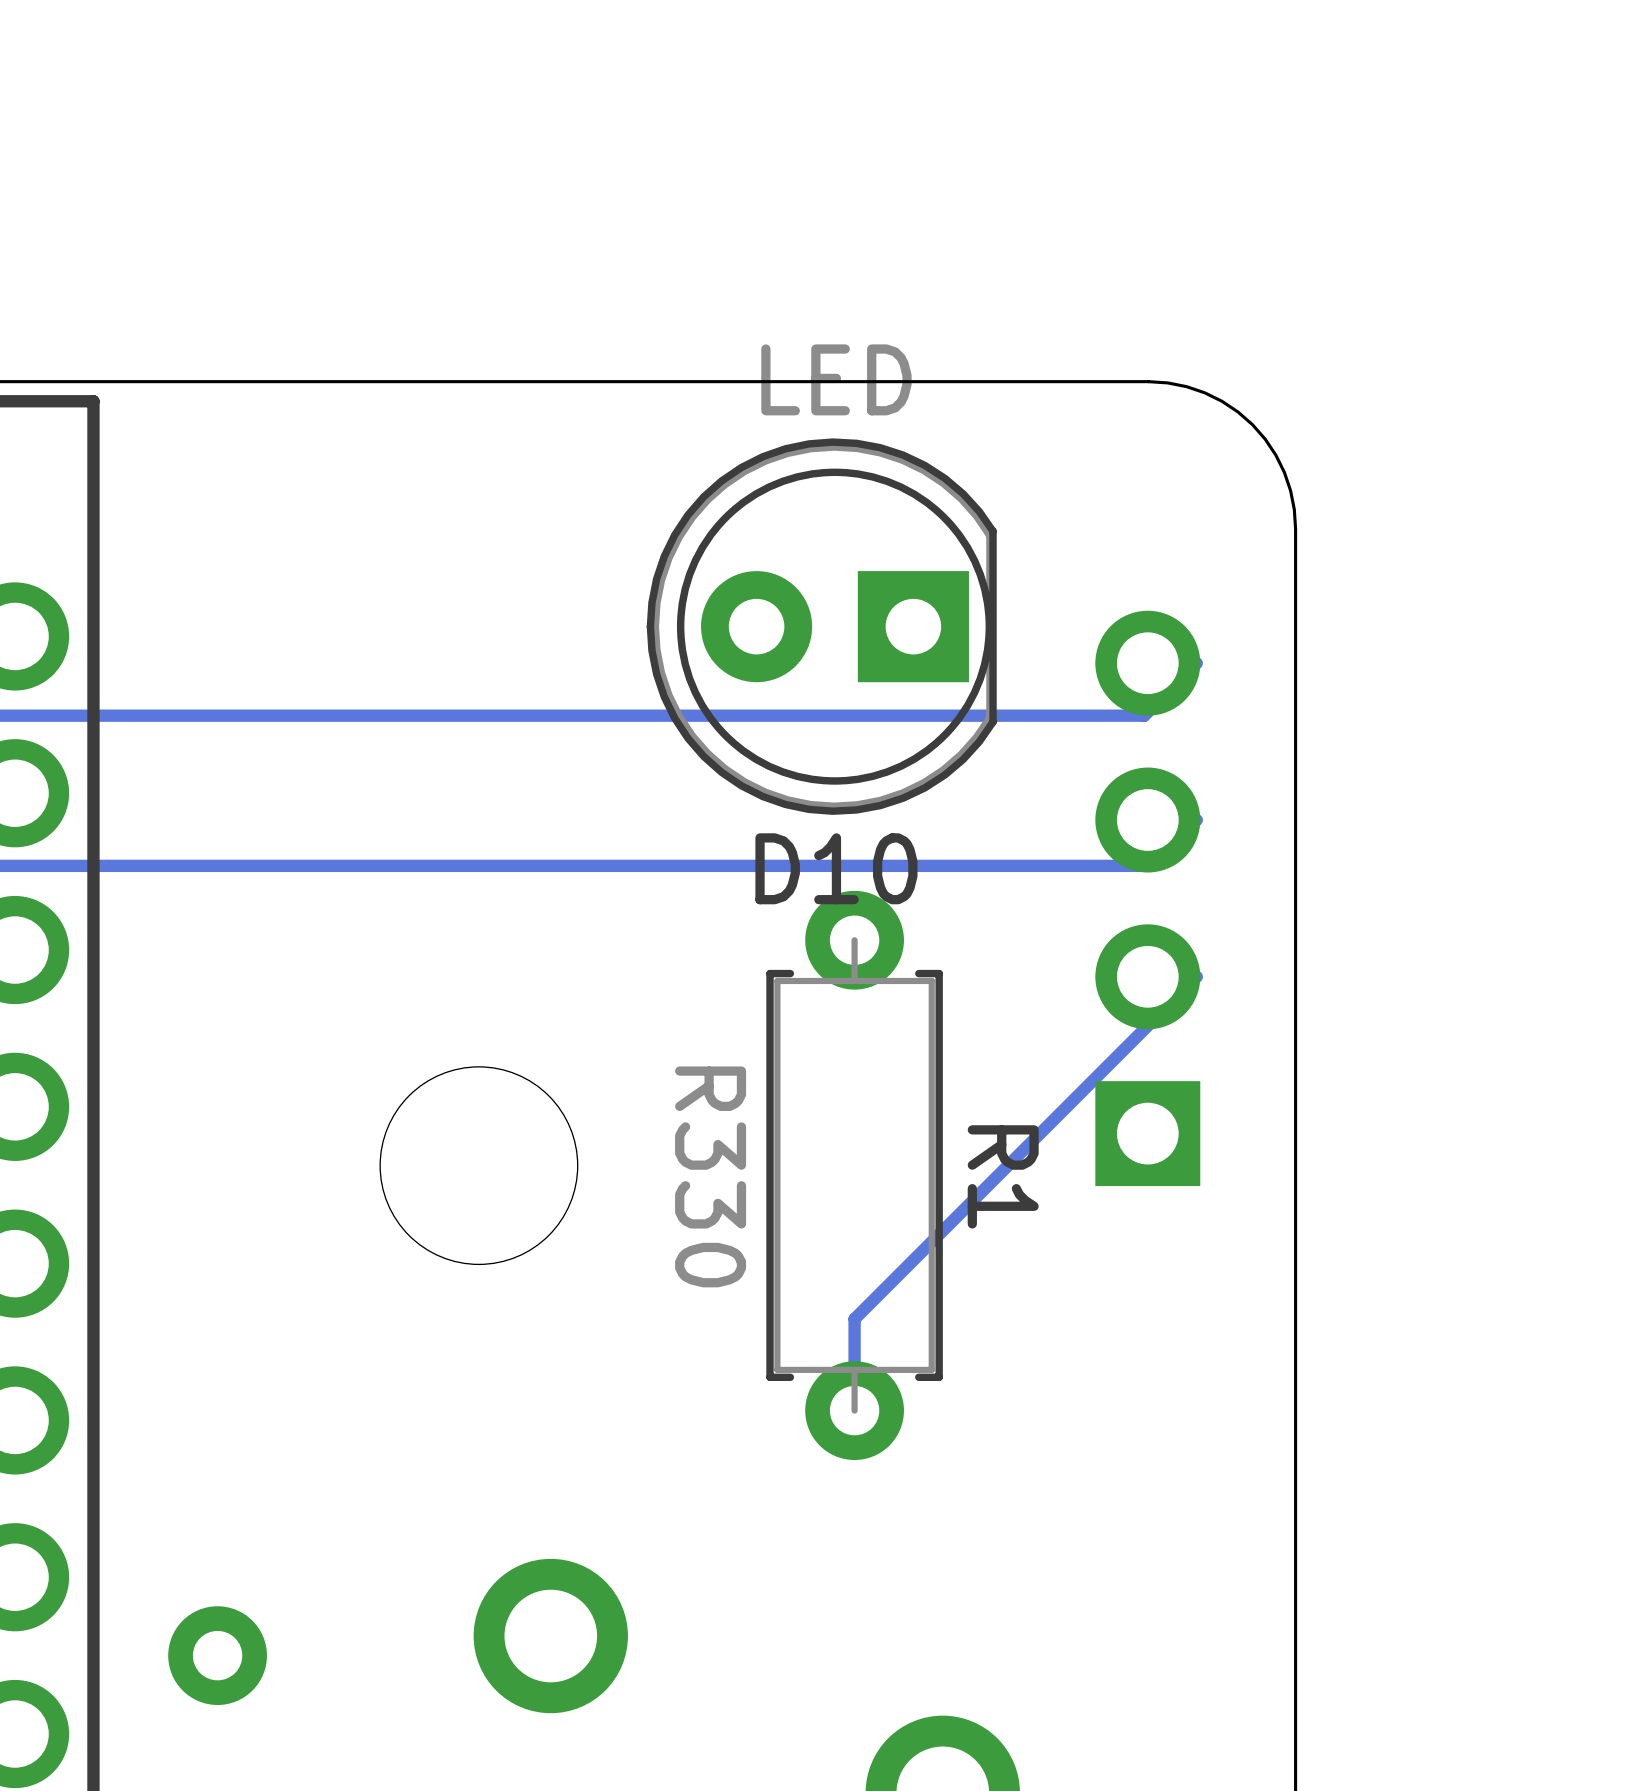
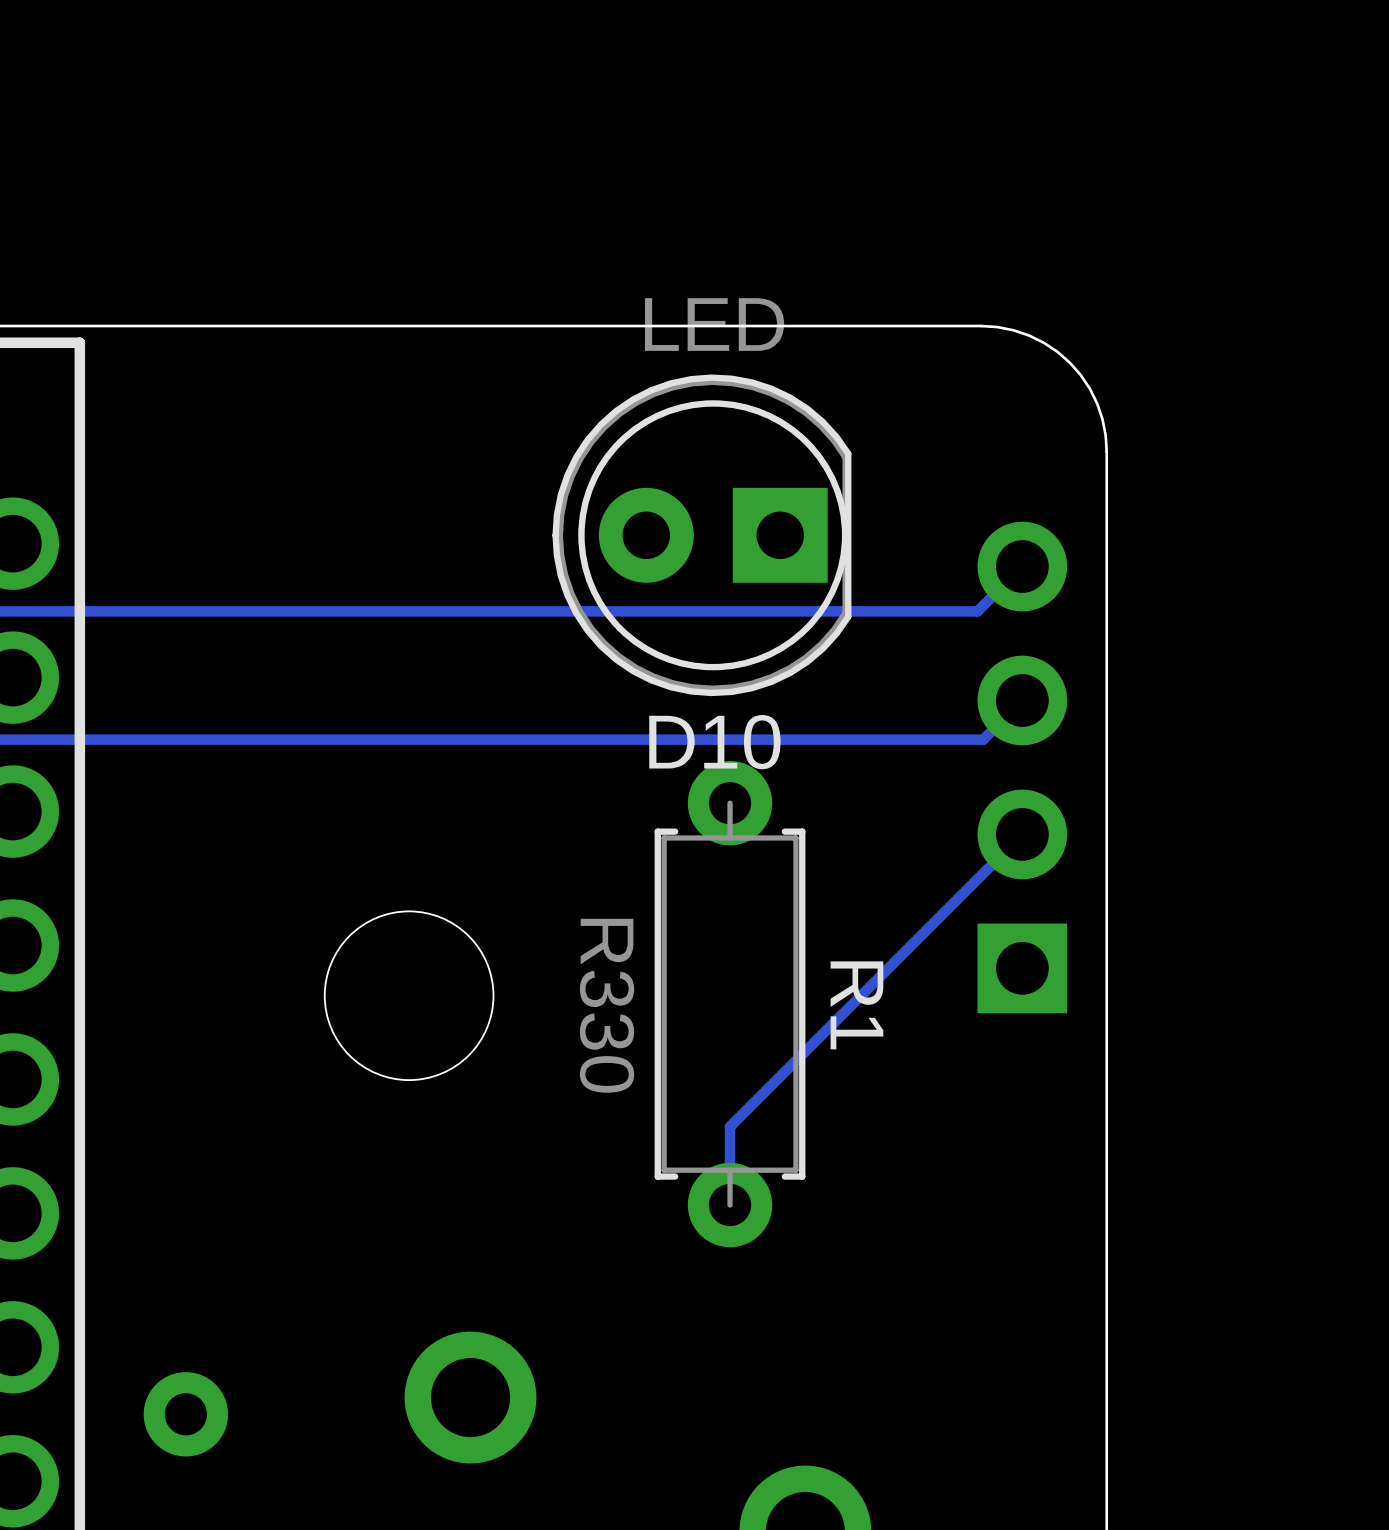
part position: (1147, 898) -> (1022, 767)

